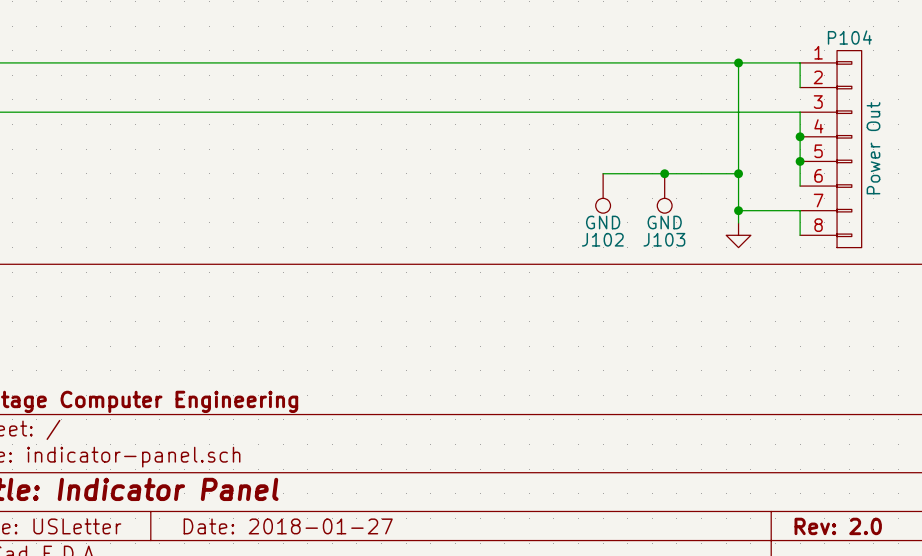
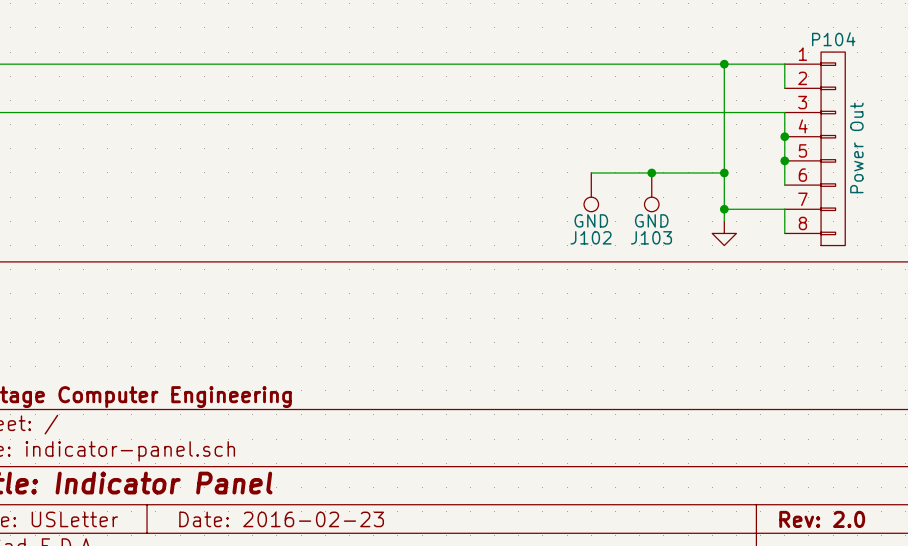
title block: Date: 2018-01-27 (288, 526) -> Date: 2016-02-23 (281, 519)

